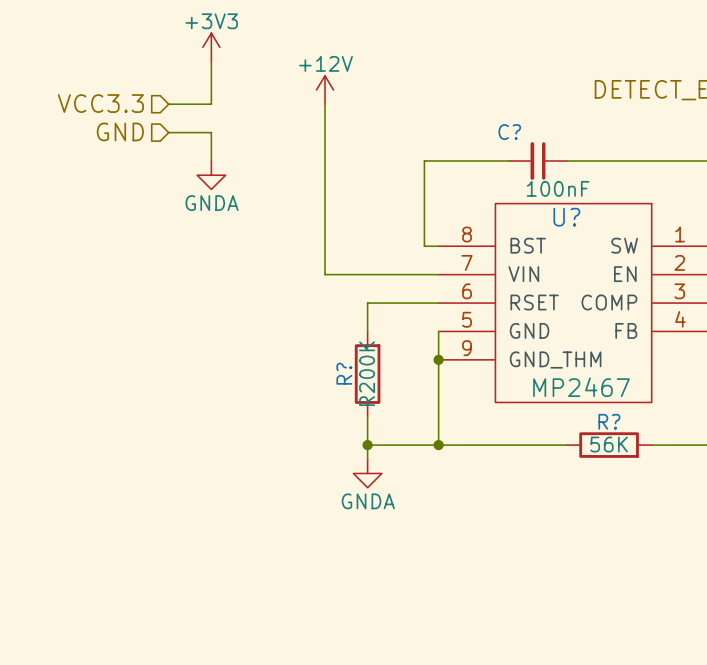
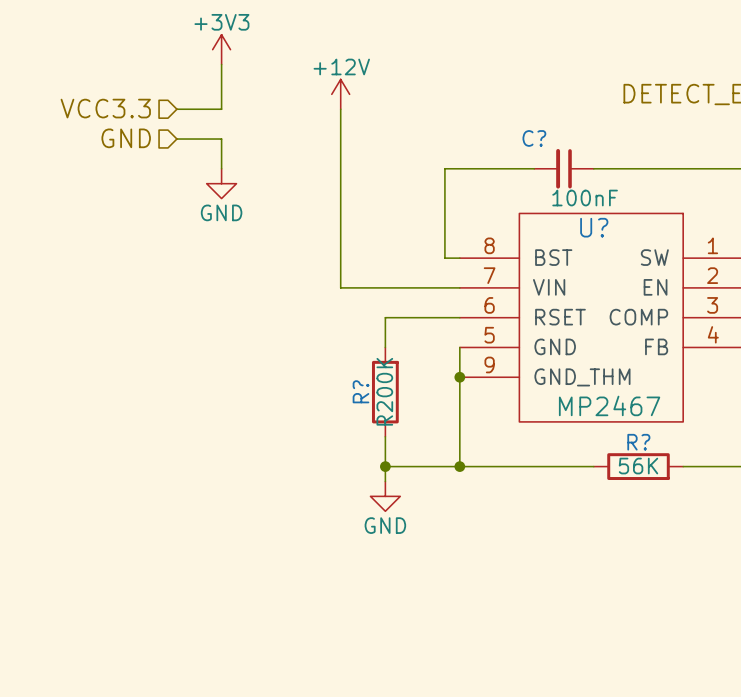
power symbol: GNDA (211, 175) -> GND (221, 183)
power symbol: GNDA (367, 473) -> GND (385, 496)

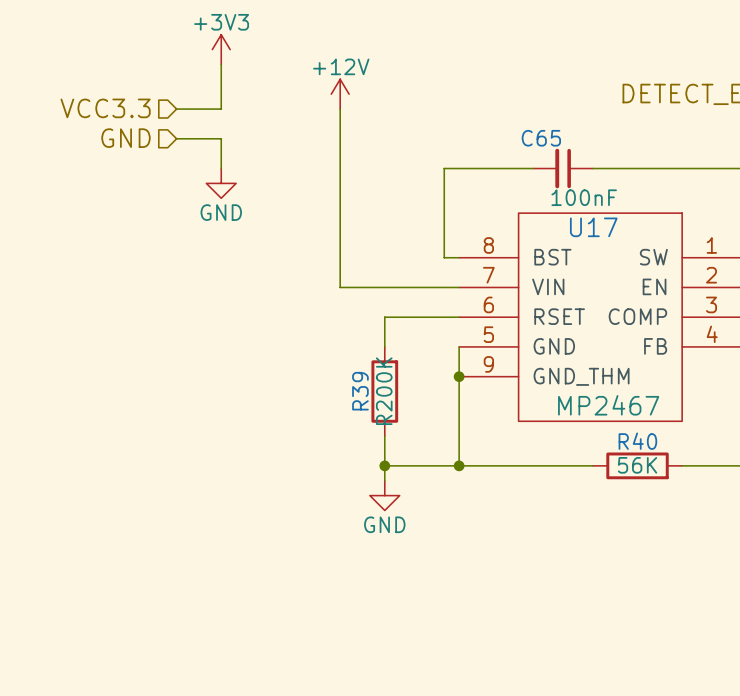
C? name: C? (534, 138) -> C65 (541, 138)
U? name: U? (594, 227) -> U17 (593, 227)
R? name: R? (360, 391) -> R39 (360, 391)
R? name: R? (638, 442) -> R40 (637, 441)

